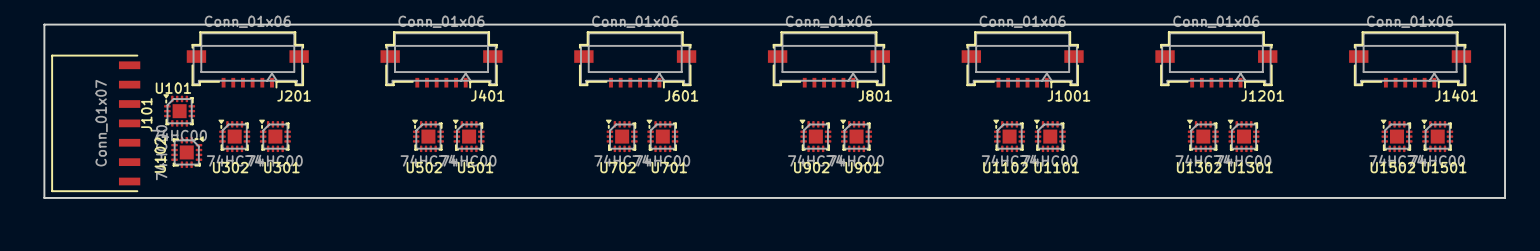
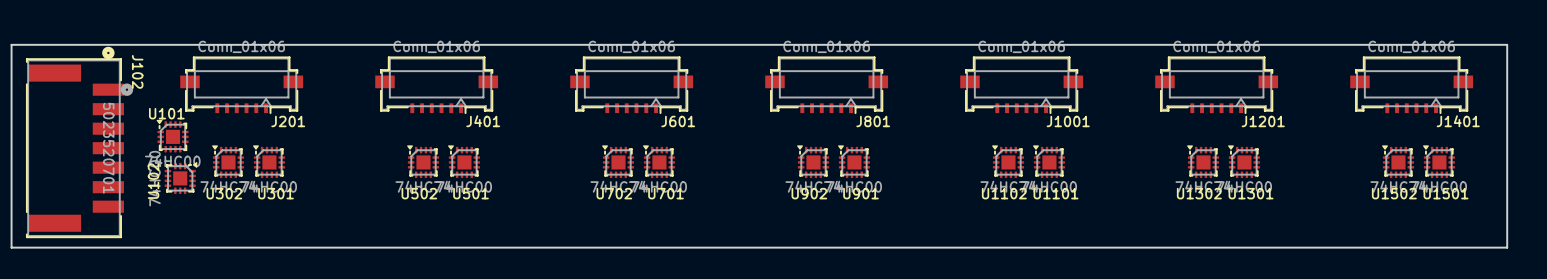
board edge: (1505, 24) (44, 24) (44, 197) (1505, 197) -> (1507, 49) (1507, 44) (11, 44) (11, 247) (1507, 247) (1507, 224)
J102: none -> 5023520701 (79, 142)
J101: Conn_01x07 (95, 123) -> none

